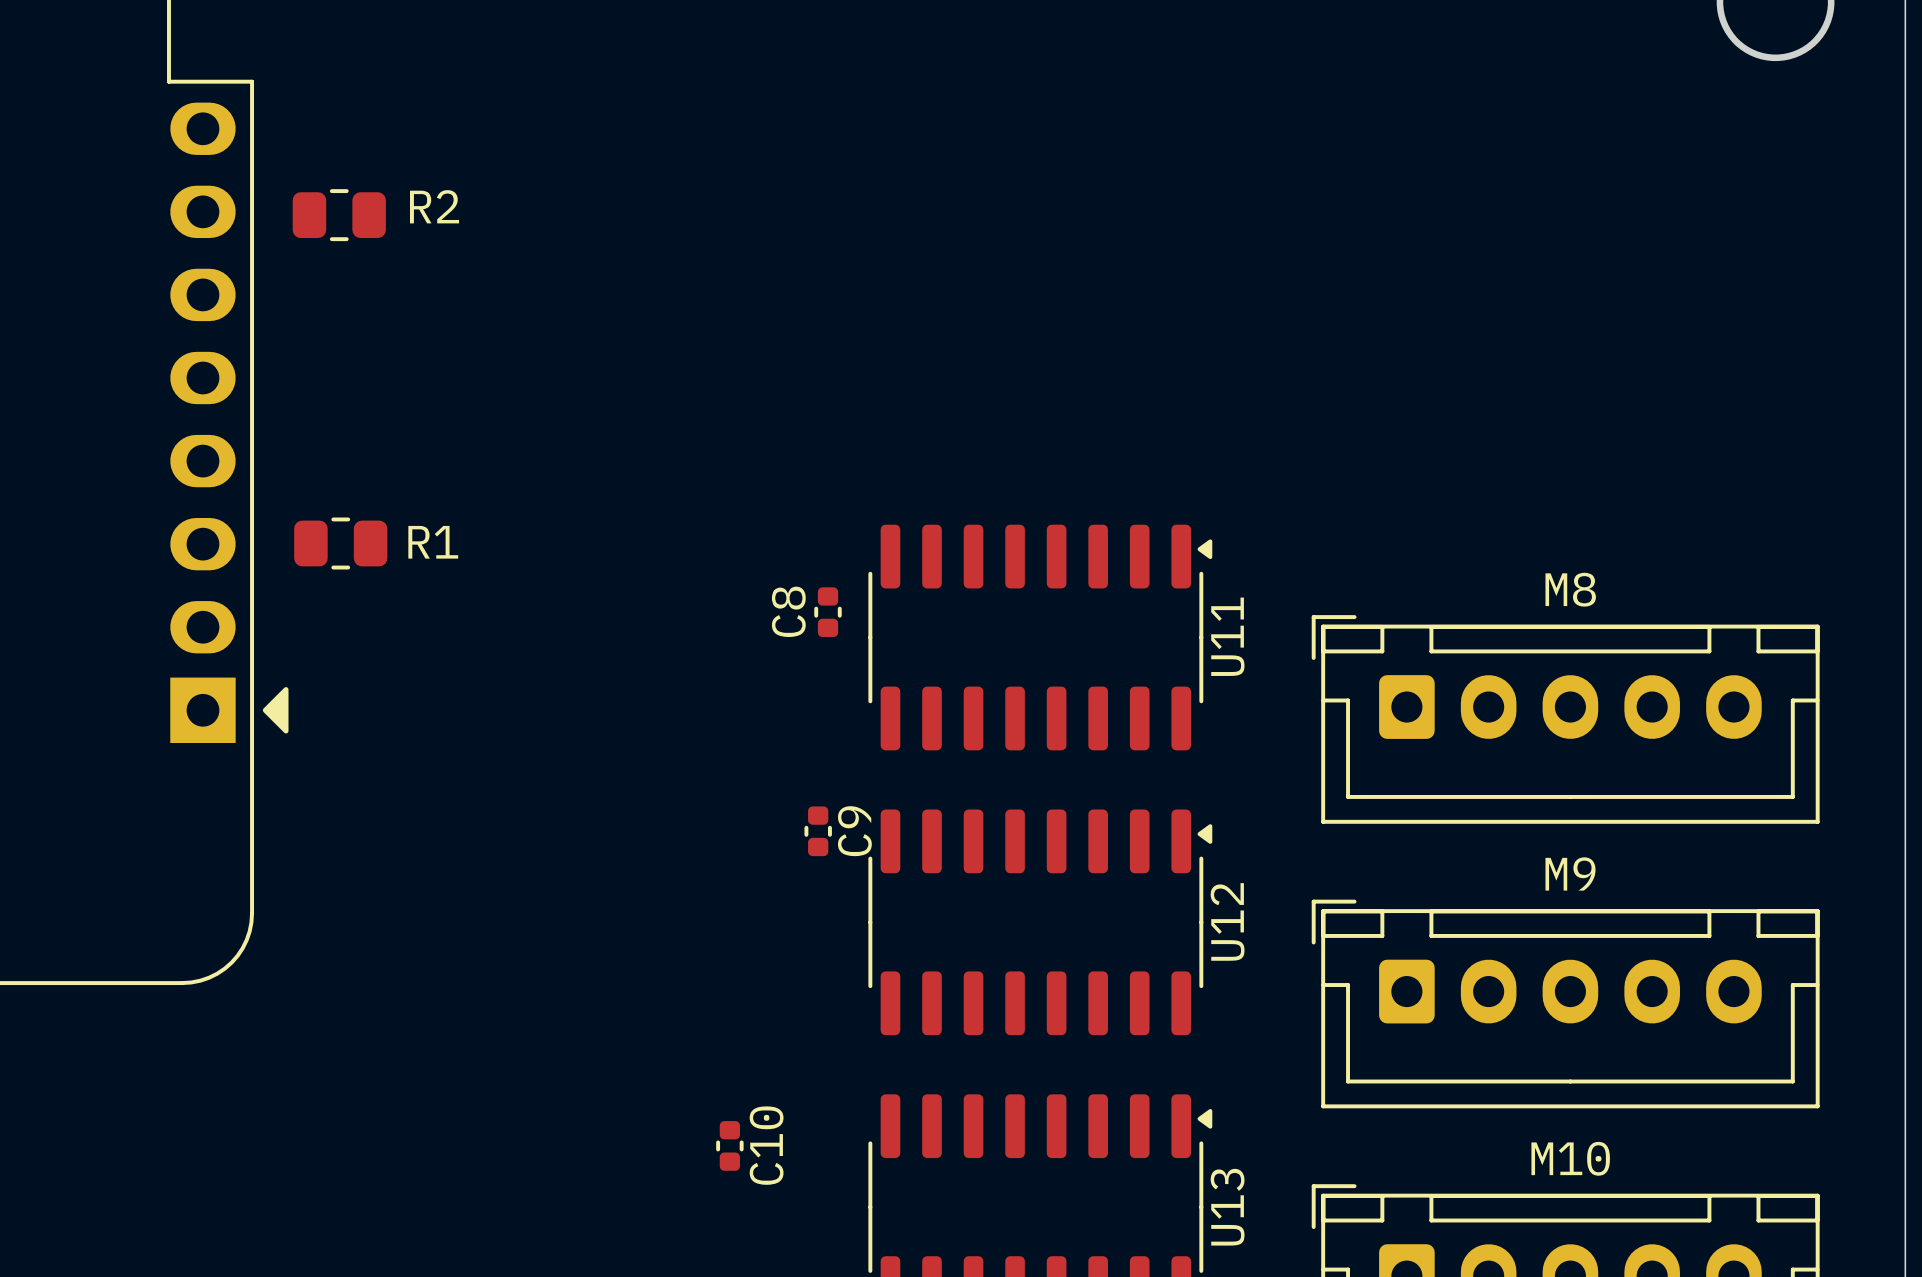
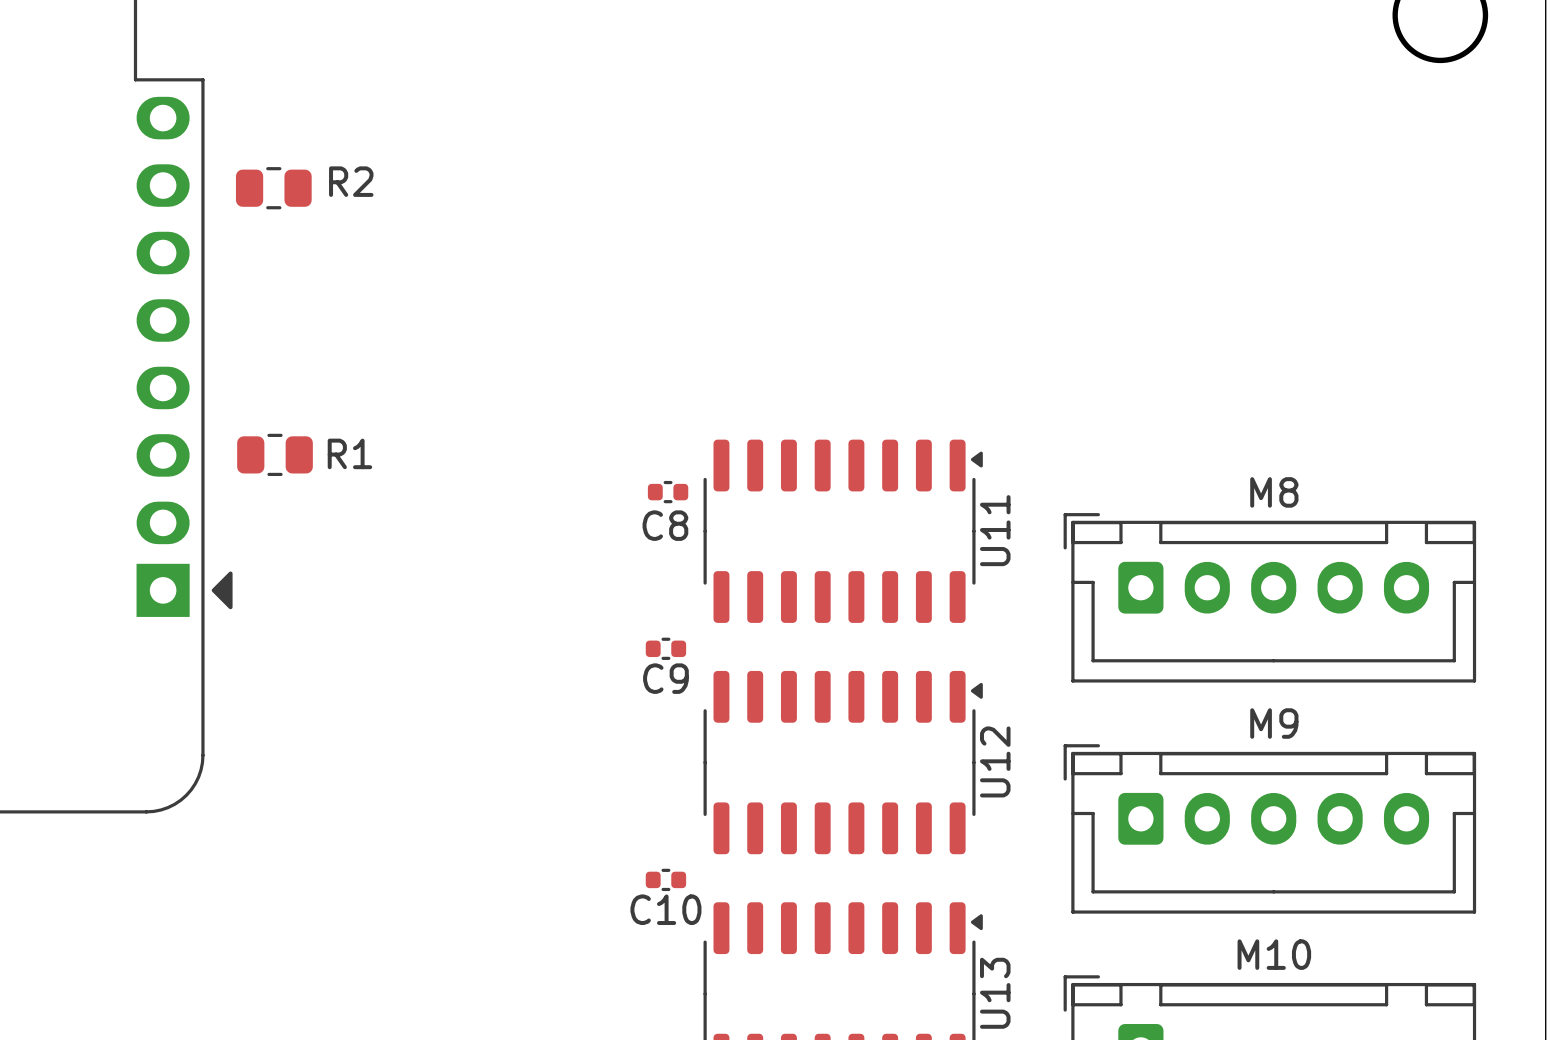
C8 rotation: 0° (827, 612) -> 90° clockwise (668, 492)
C9 rotation: 0° (818, 831) -> 90° clockwise (665, 648)
C9 position: (818, 831) -> (665, 648)
C10 rotation: 0° (729, 1145) -> 90° clockwise (665, 879)
C10 position: (729, 1145) -> (665, 879)

